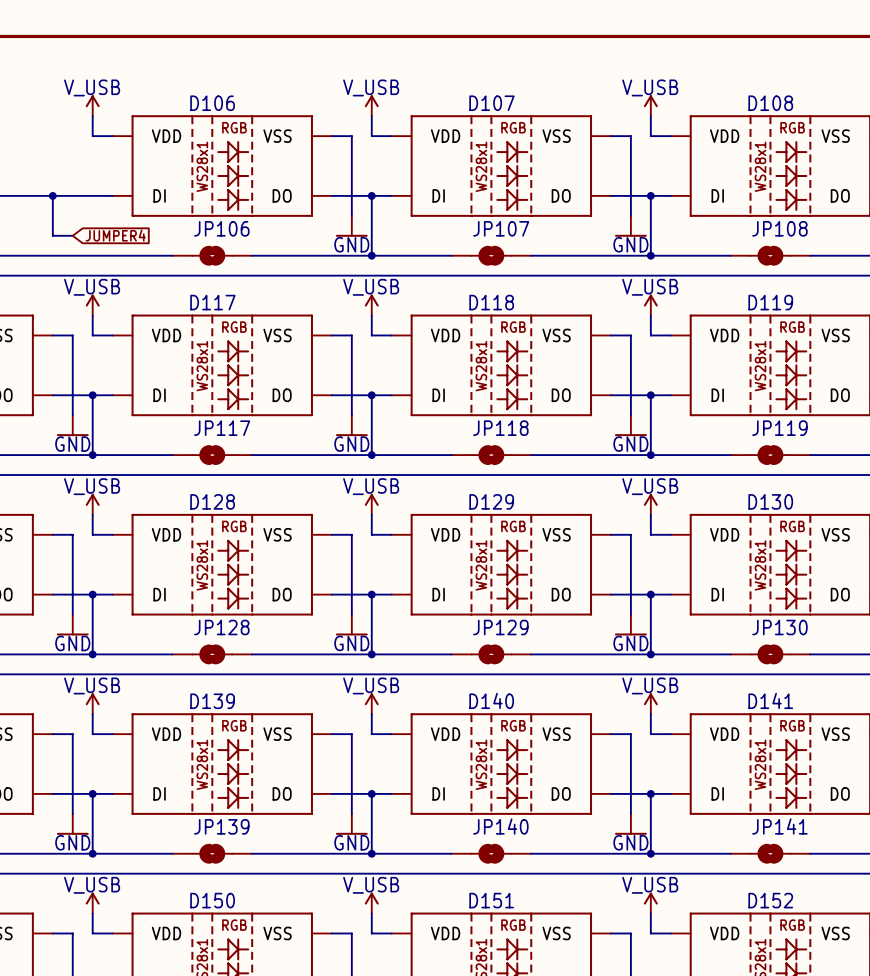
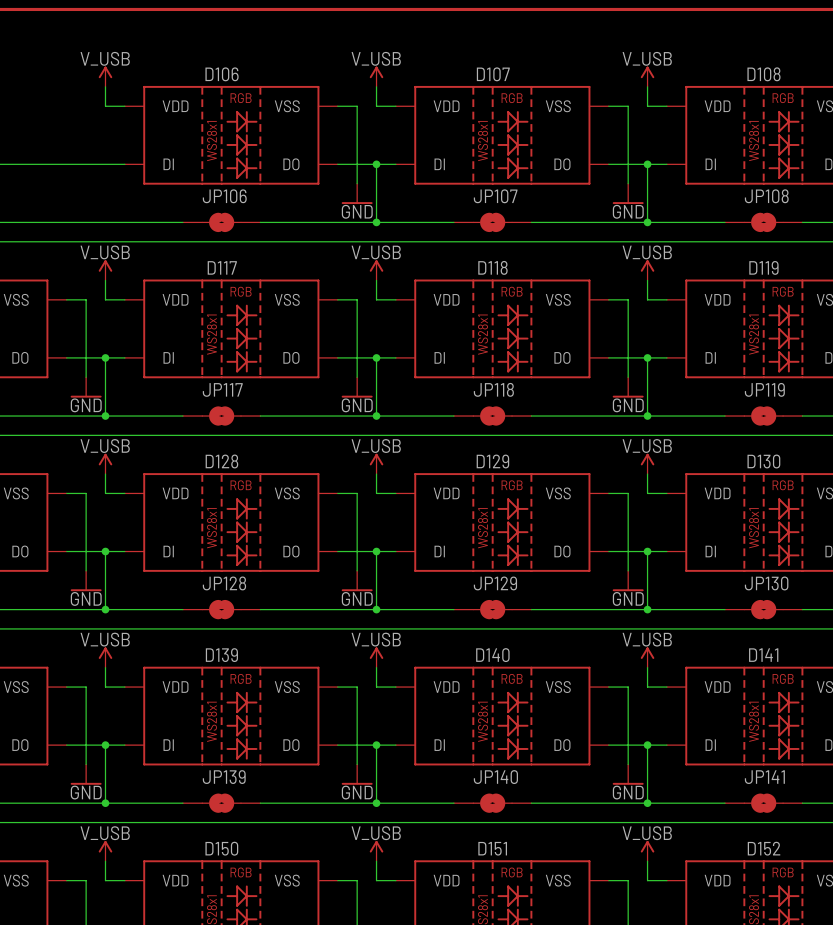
wire: (52, 195) (52, 235) (72, 235) -> none
junction: (52, 195) -> none
global label: JUMPER4 (115, 235) -> none

